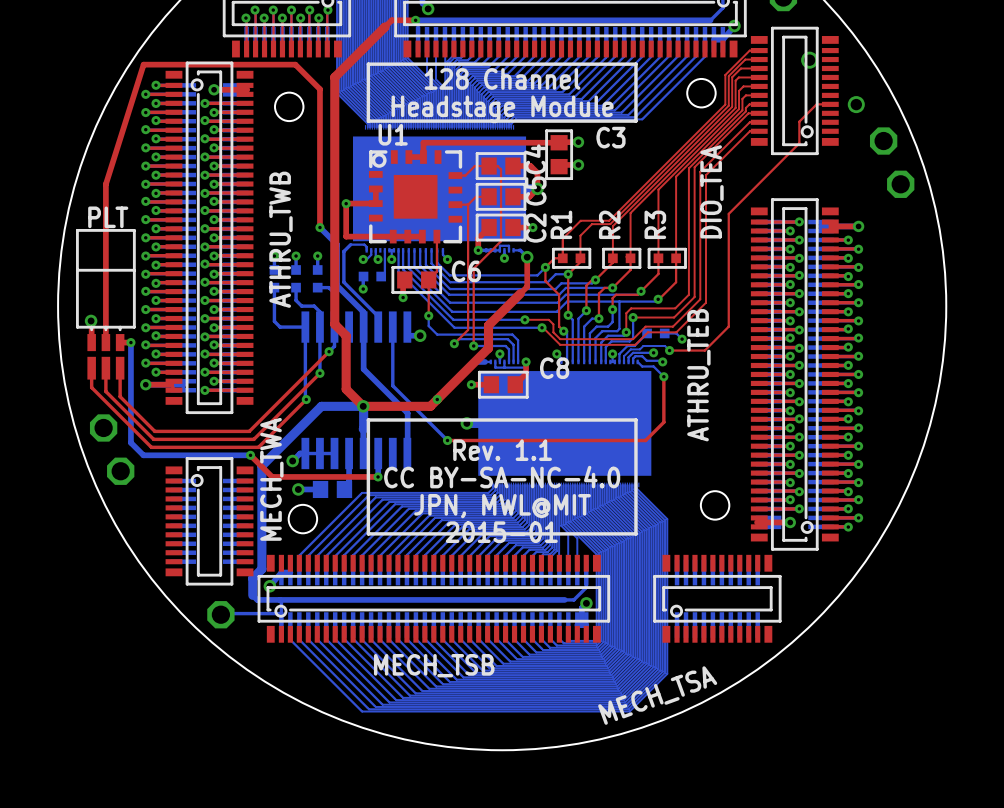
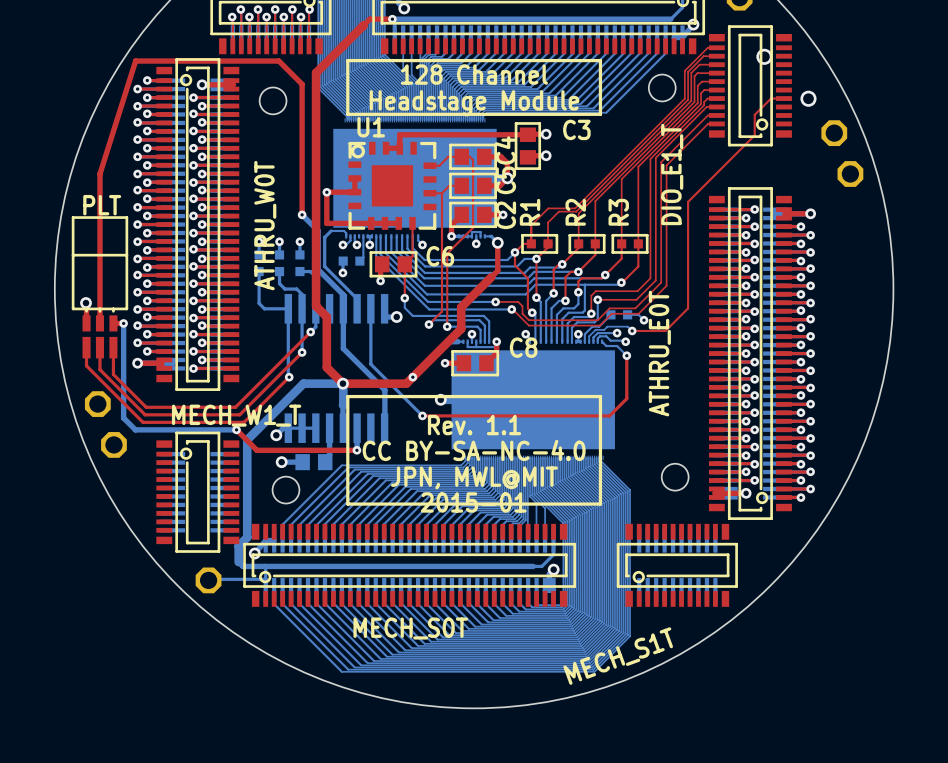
DIO_TEA name: DIO_TEA (711, 191) -> DIO_E1_T (672, 174)
ATHRU_TWB name: ATHRU_TWB (280, 239) -> ATHRU_W0T (265, 225)
ATHRU_TEB name: ATHRU_TEB (698, 375) -> ATHRU_E0T (659, 353)
MECH_TWA name: MECH_TWA (271, 479) -> MECH_W1_T (236, 415)
MECH_TSB name: MECH_TSB (434, 665) -> MECH_S0T (410, 628)
MECH_TSA name: MECH_TSA (657, 695) -> MECH_S1T (618, 656)

